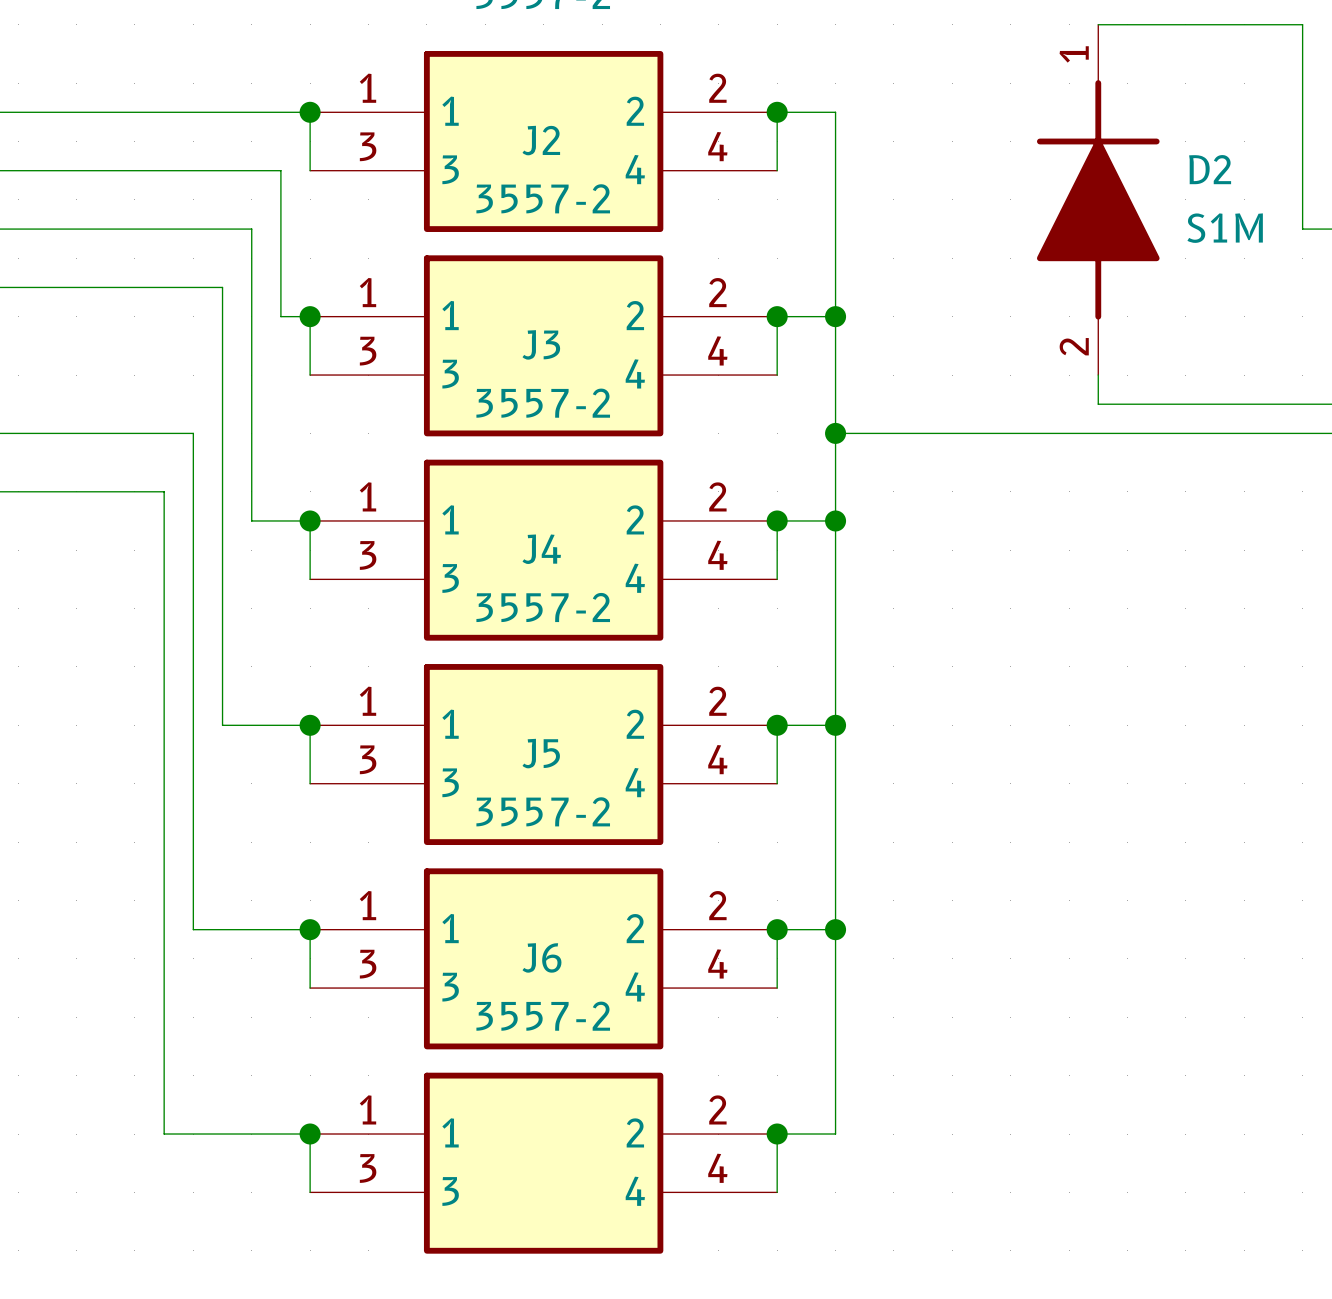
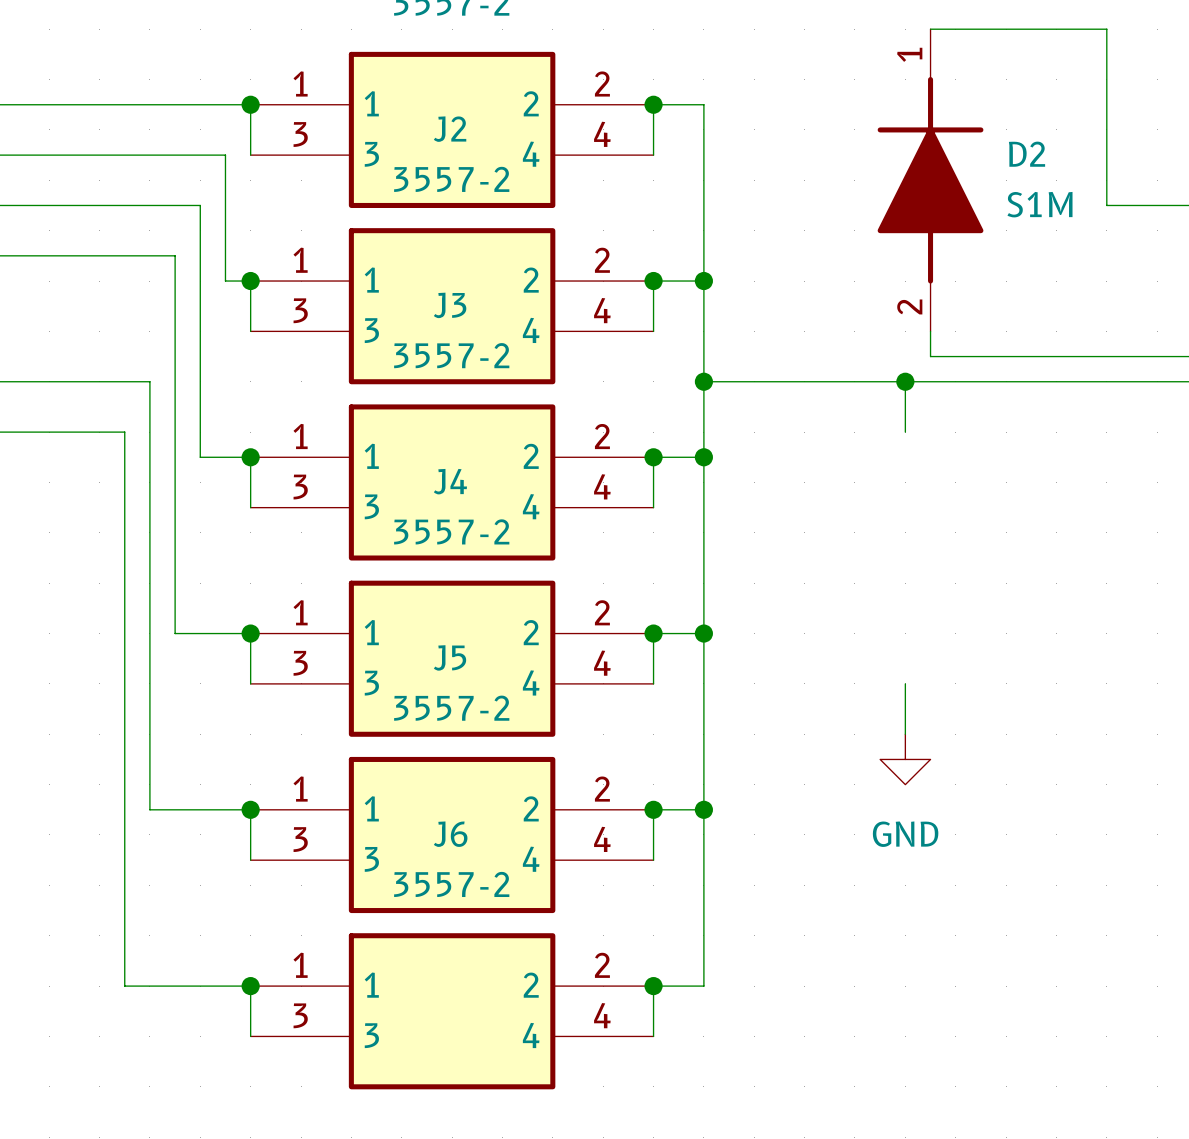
wire: none -> (905, 381) (905, 432)
junction: none -> (905, 381)
wire: none -> (905, 683) (905, 734)
power symbol: none -> GND (905, 759)

